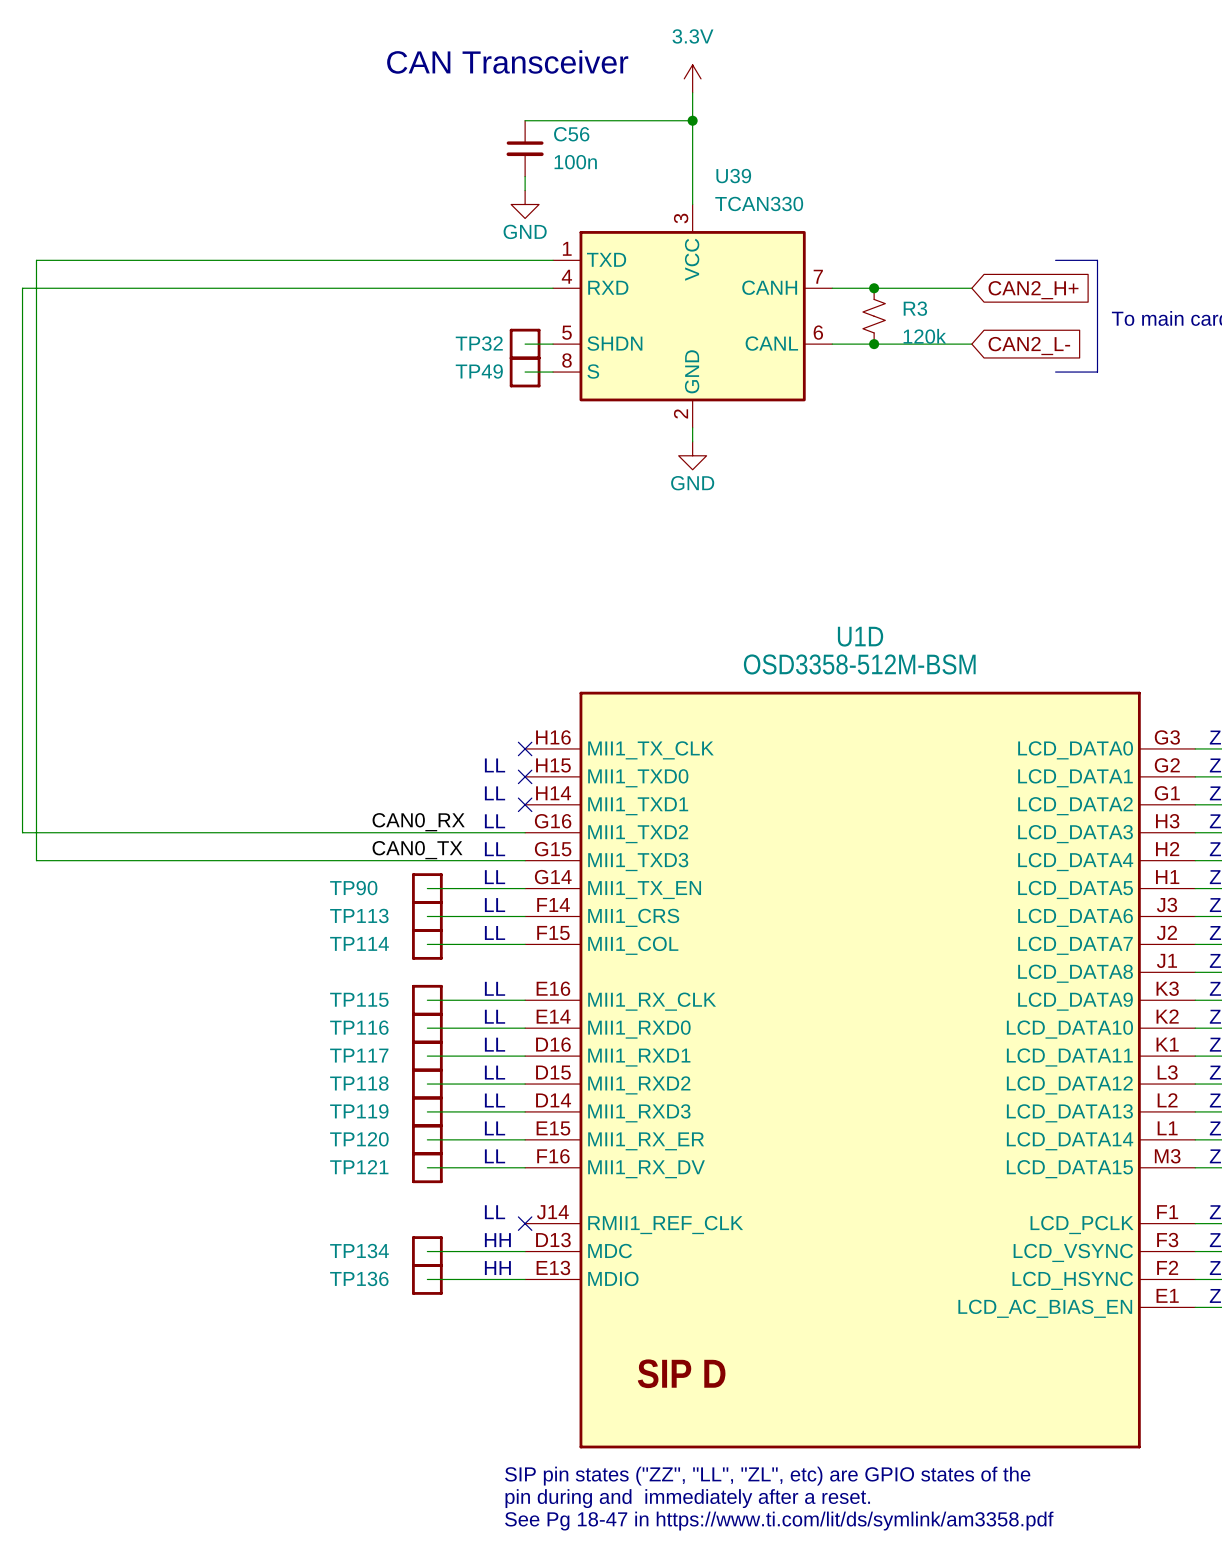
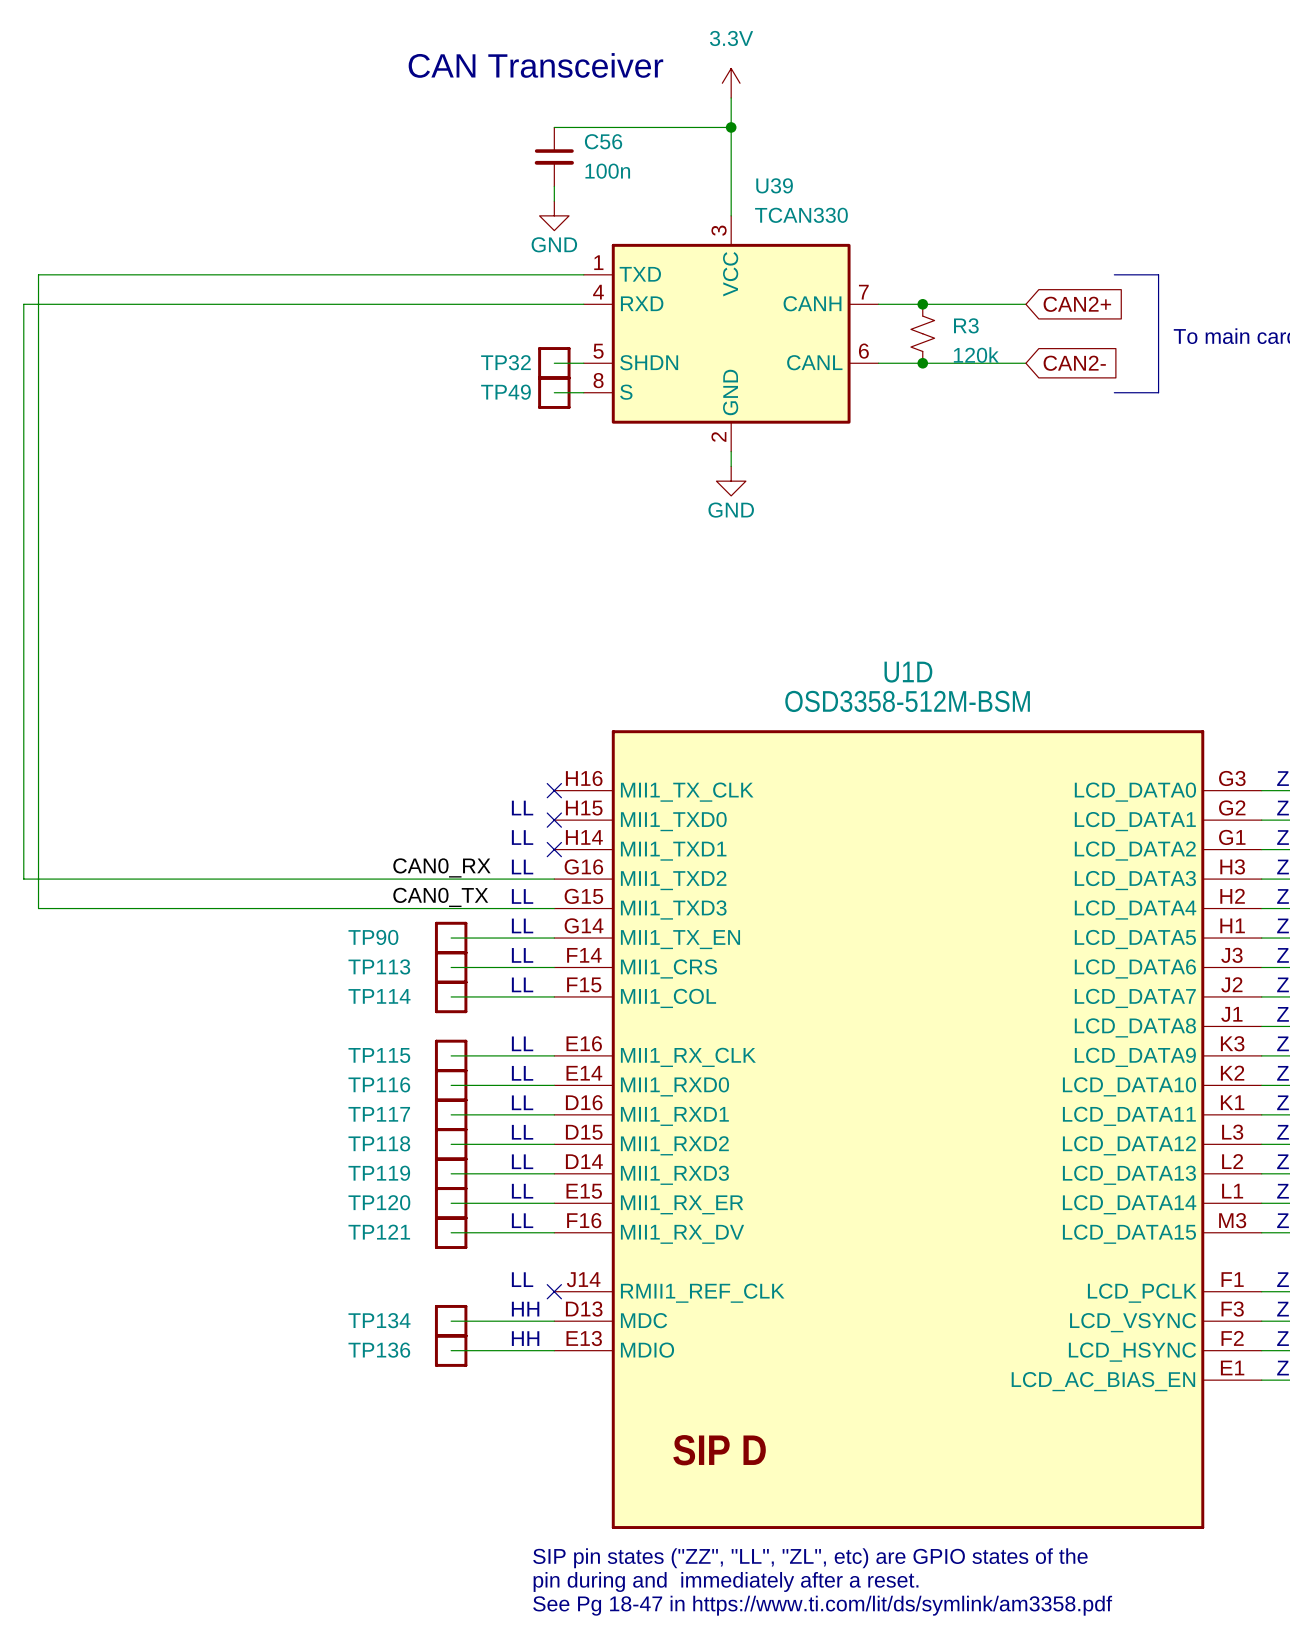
global label: CAN2_H+ (1033, 290) -> CAN2+ (1077, 304)
global label: CAN2_L- (1029, 346) -> CAN2- (1074, 363)

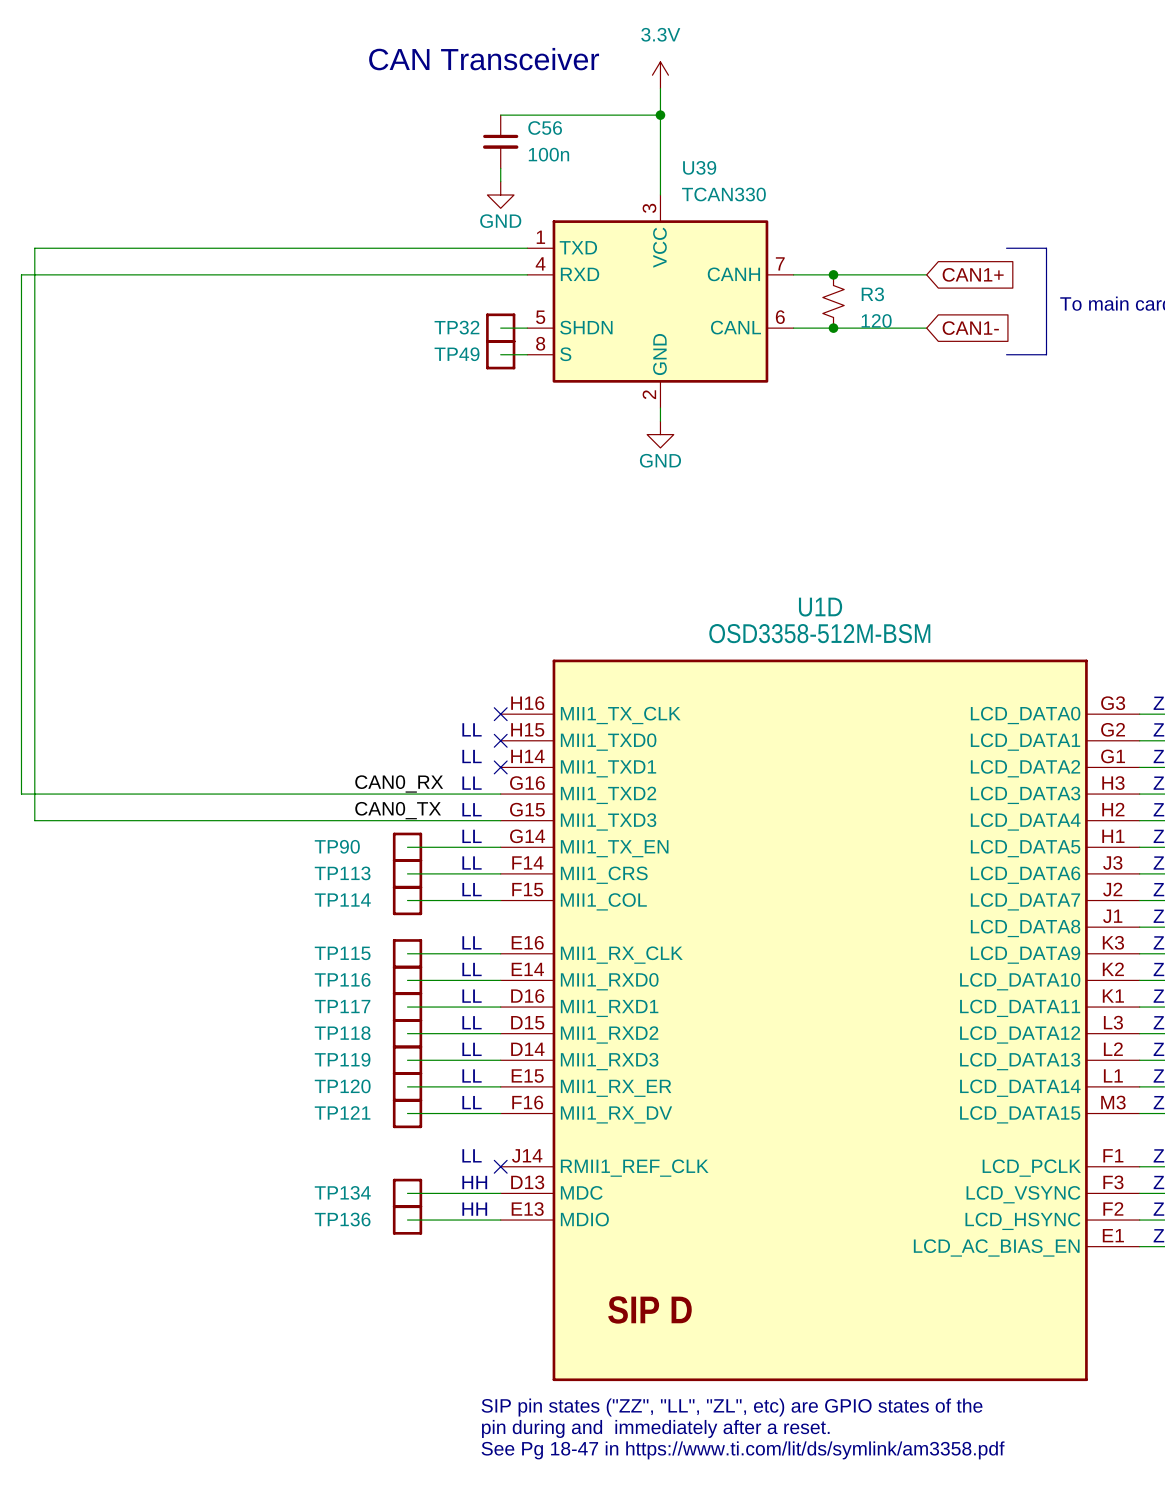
global label: CAN2+ (1077, 304) -> CAN1+ (973, 274)
R3 value: 120k (976, 355) -> 120 (876, 320)
global label: CAN2- (1074, 363) -> CAN1- (970, 328)

